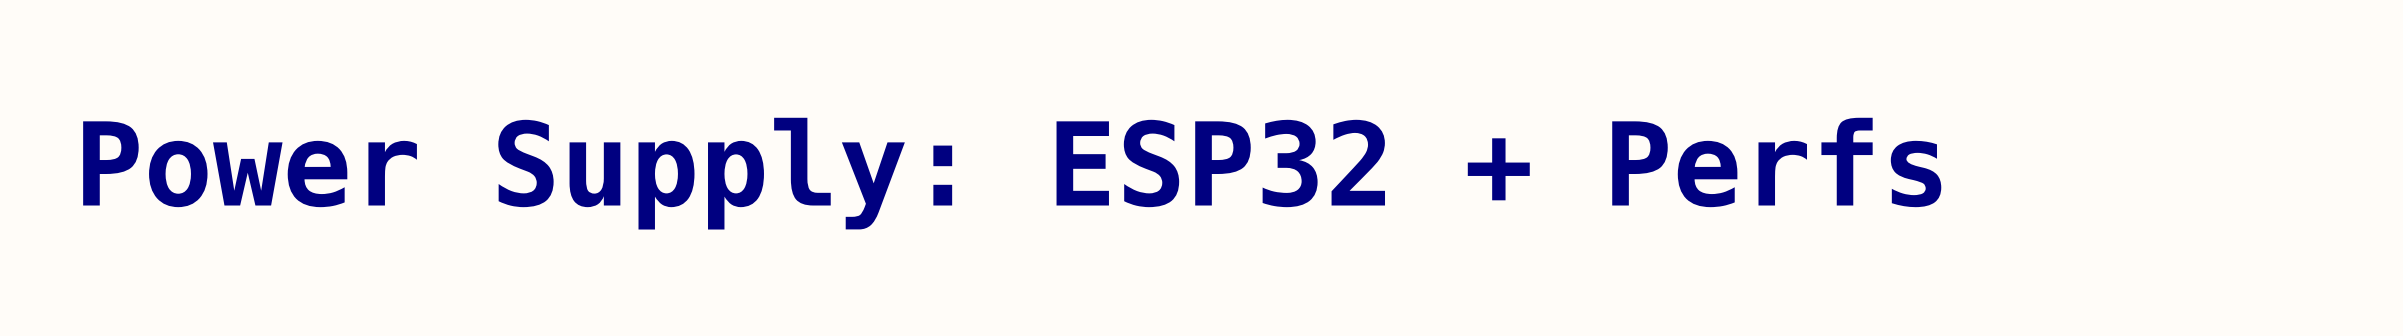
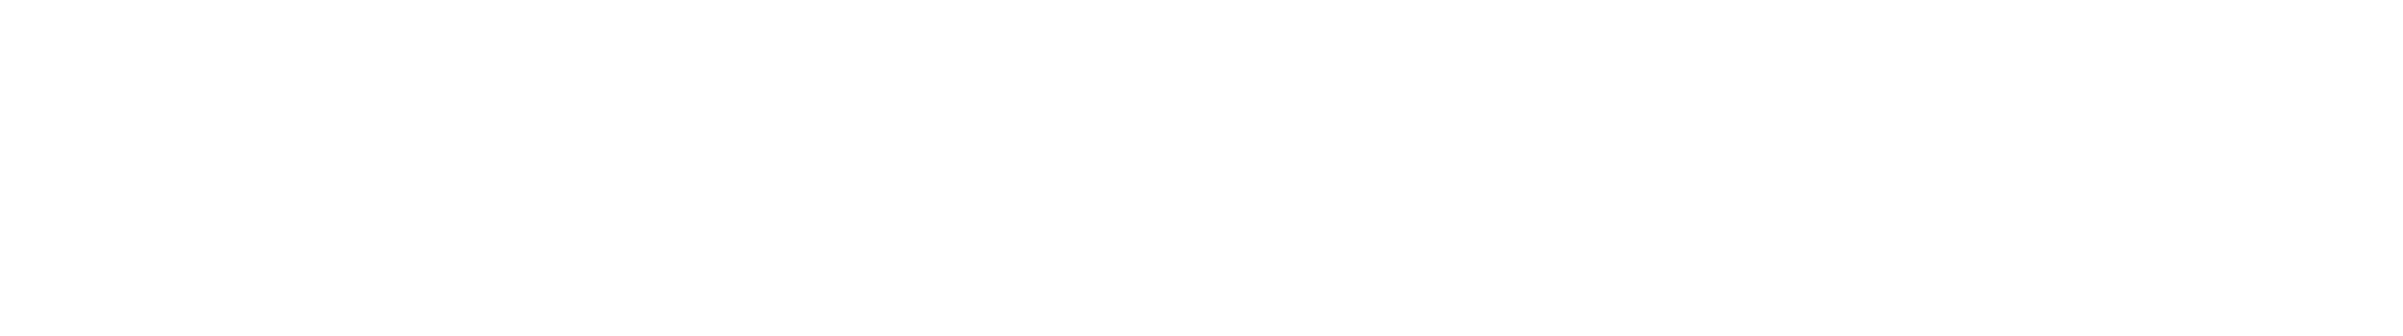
text: Power Supply: ESP32 + Perfs (1012, 173) -> none

